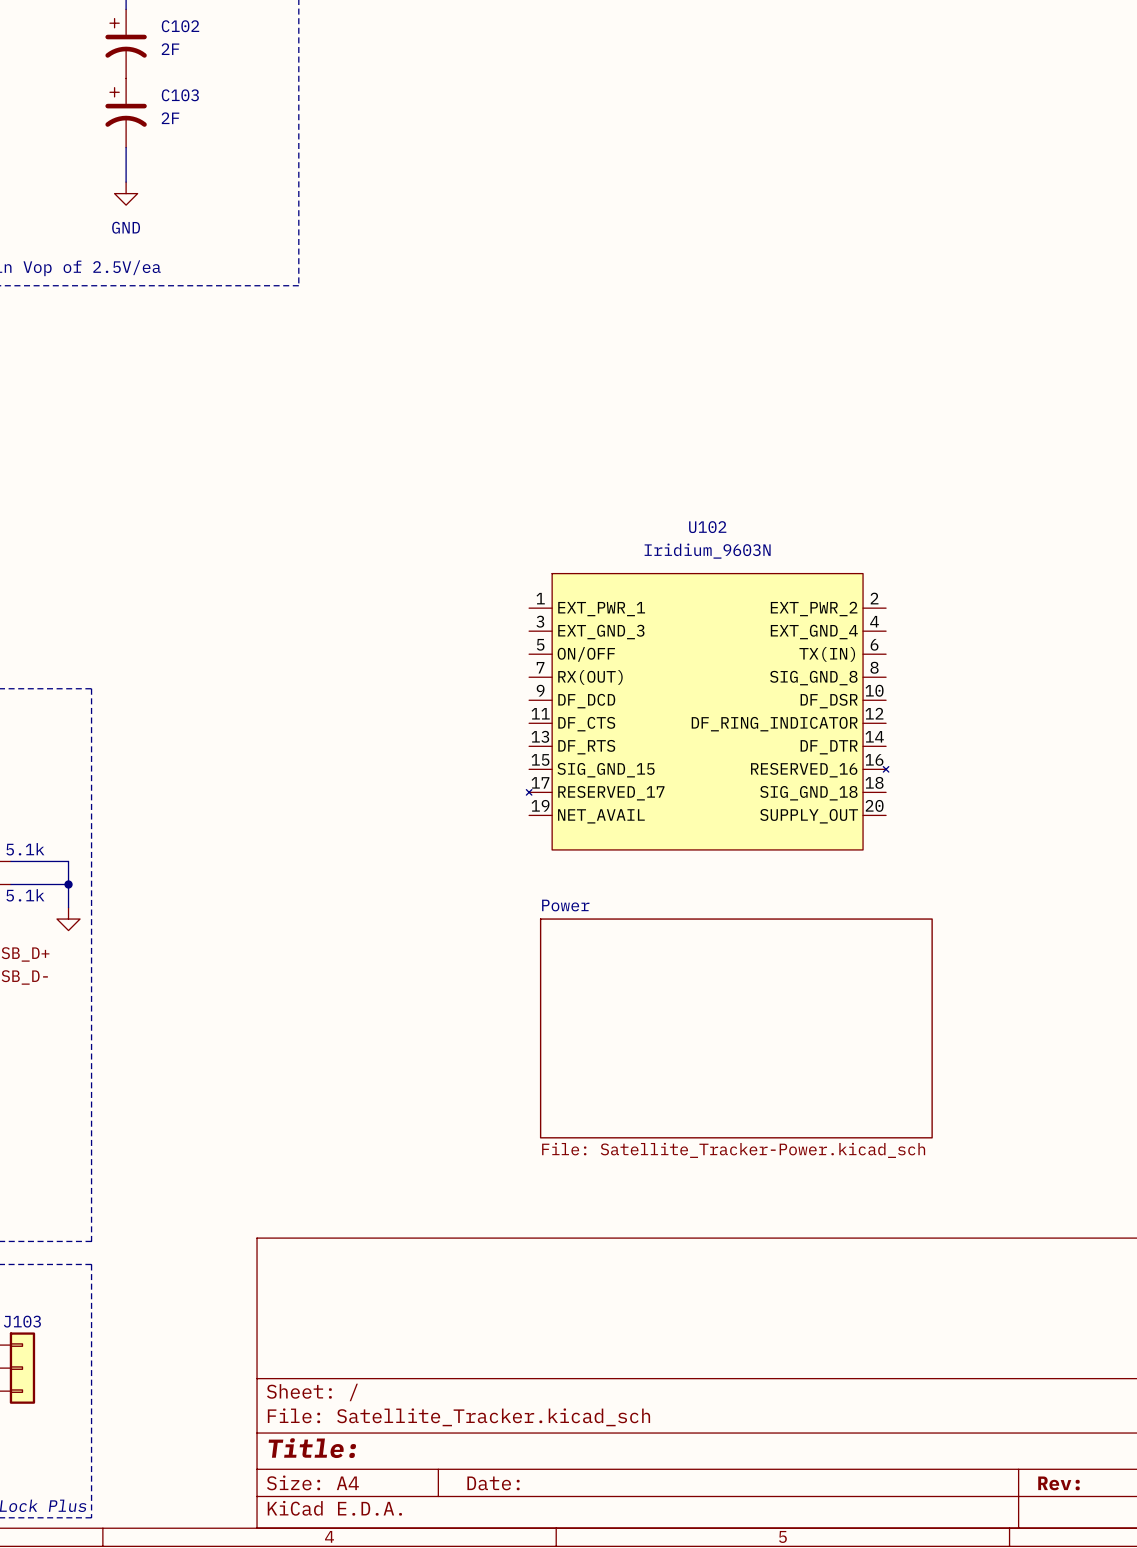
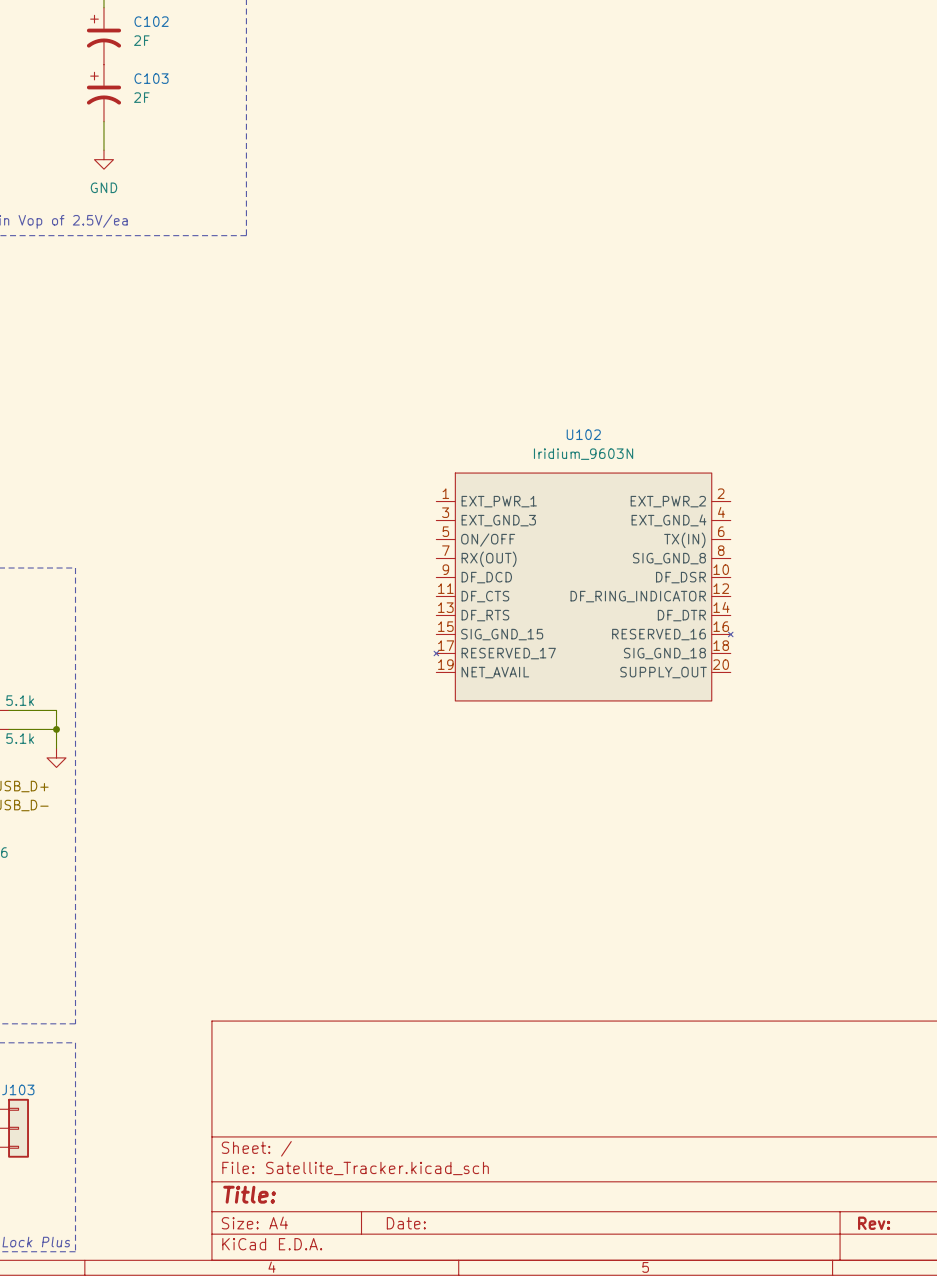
sheet Power: File: Satellite_Tracker-Power.kicad_sch (736, 1028) -> none

